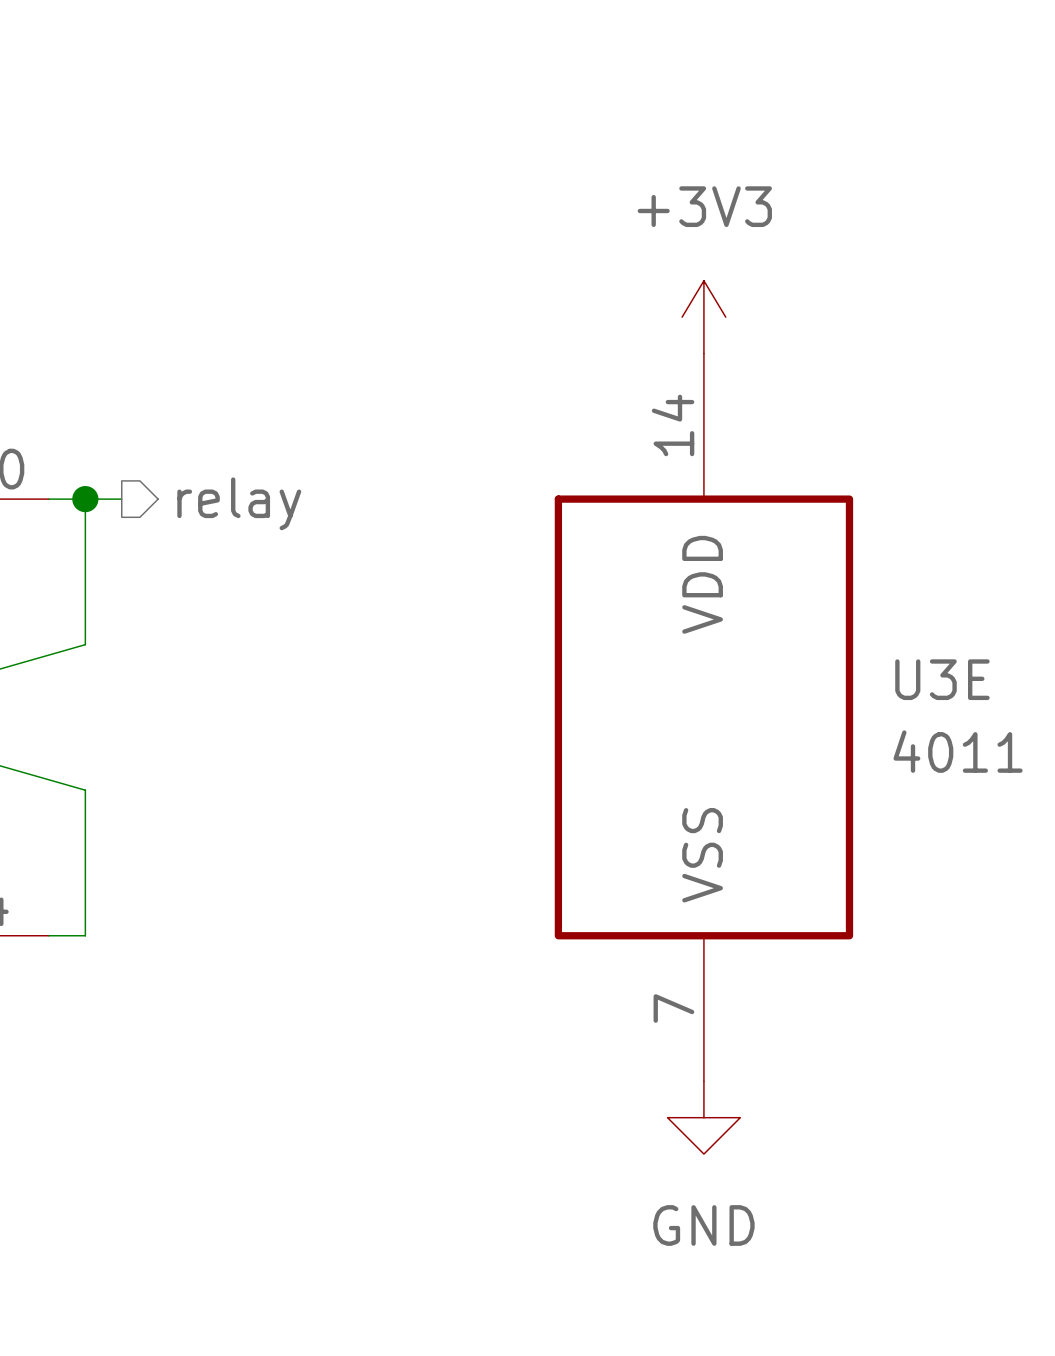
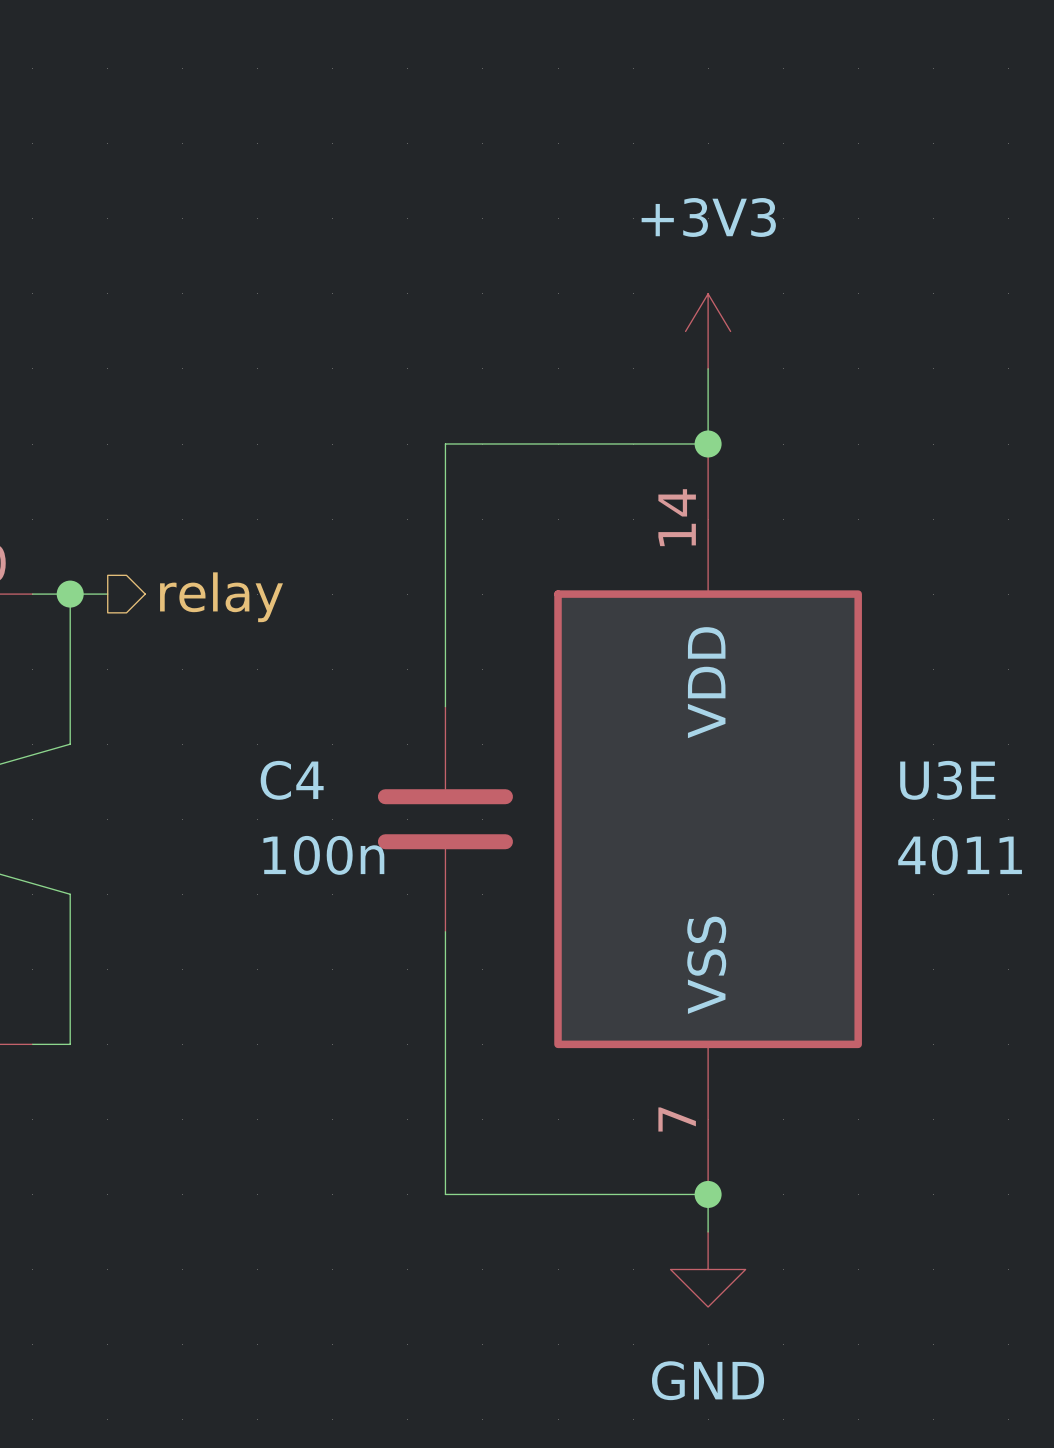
wire: none -> (708, 368) (708, 444) (445, 444) (445, 706)
power symbol position: +3V3 (703, 317) -> +3V3 (708, 331)
junction: none -> (708, 444)
C4: none -> 100n (445, 819)
wire: none -> (445, 931) (445, 1194) (708, 1194) (708, 1231)
junction: none -> (708, 1194)
power symbol position: GND (703, 1117) -> GND (708, 1269)

